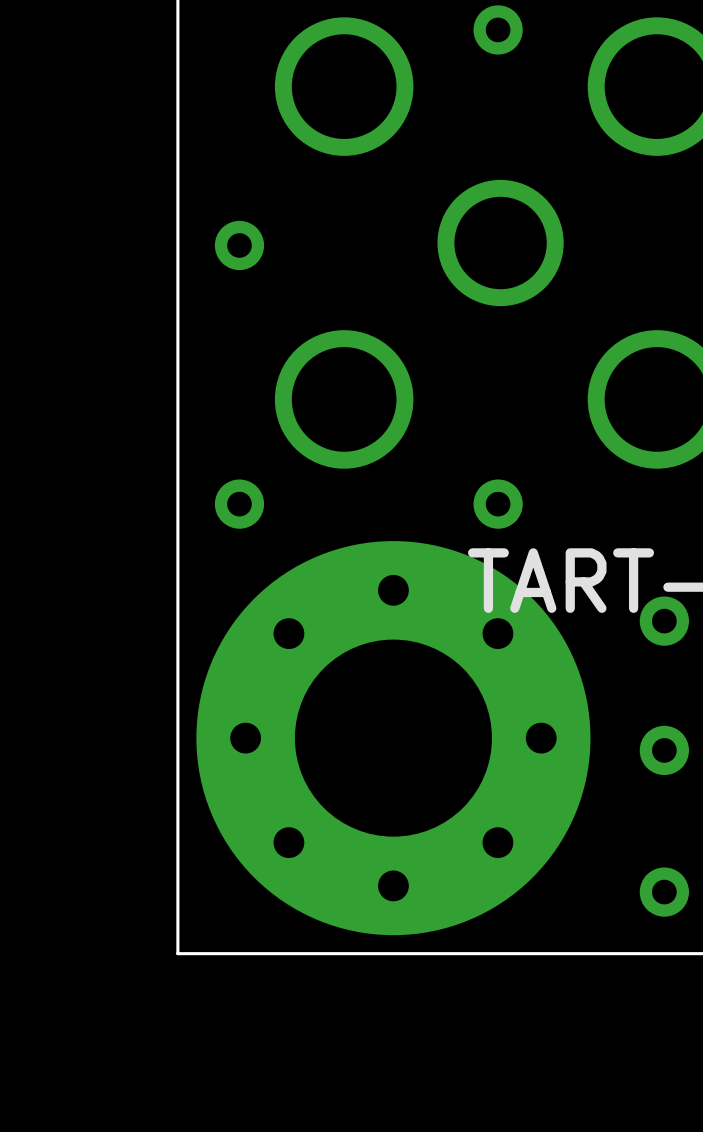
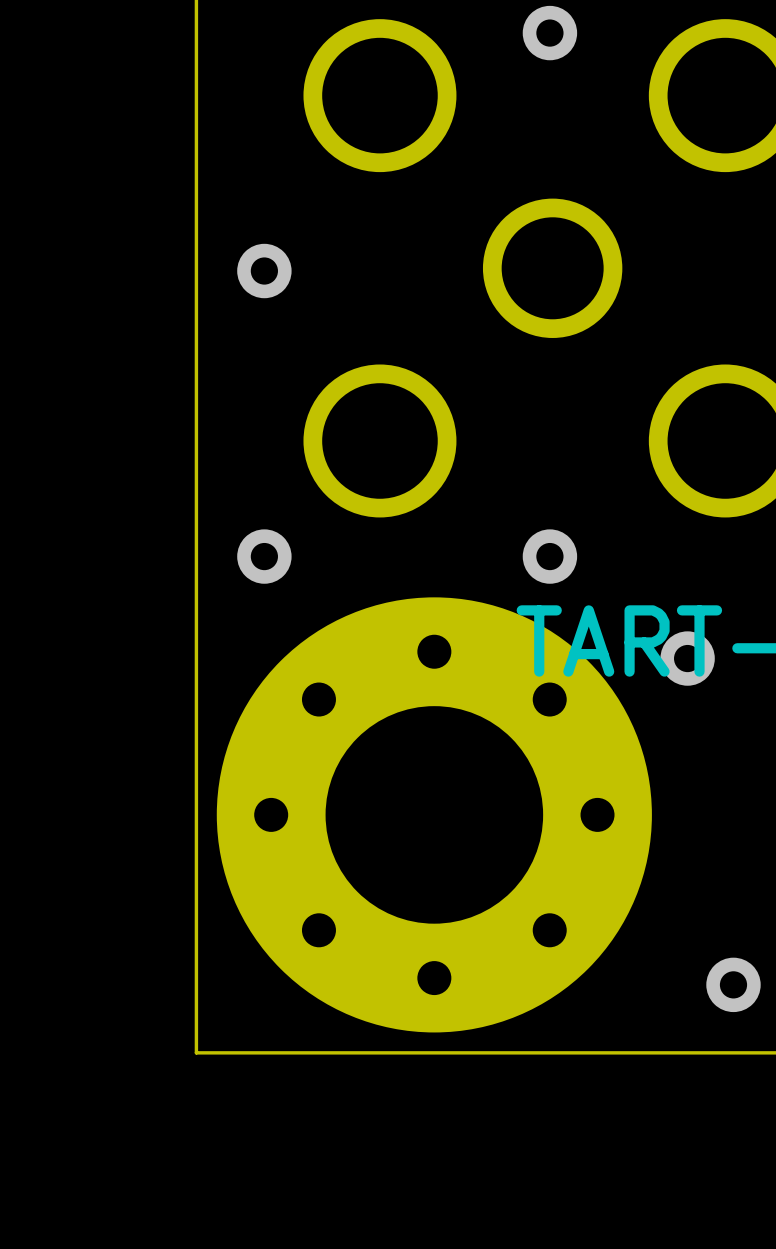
via position: (664, 621) -> (687, 658)
via: (664, 750) -> none

